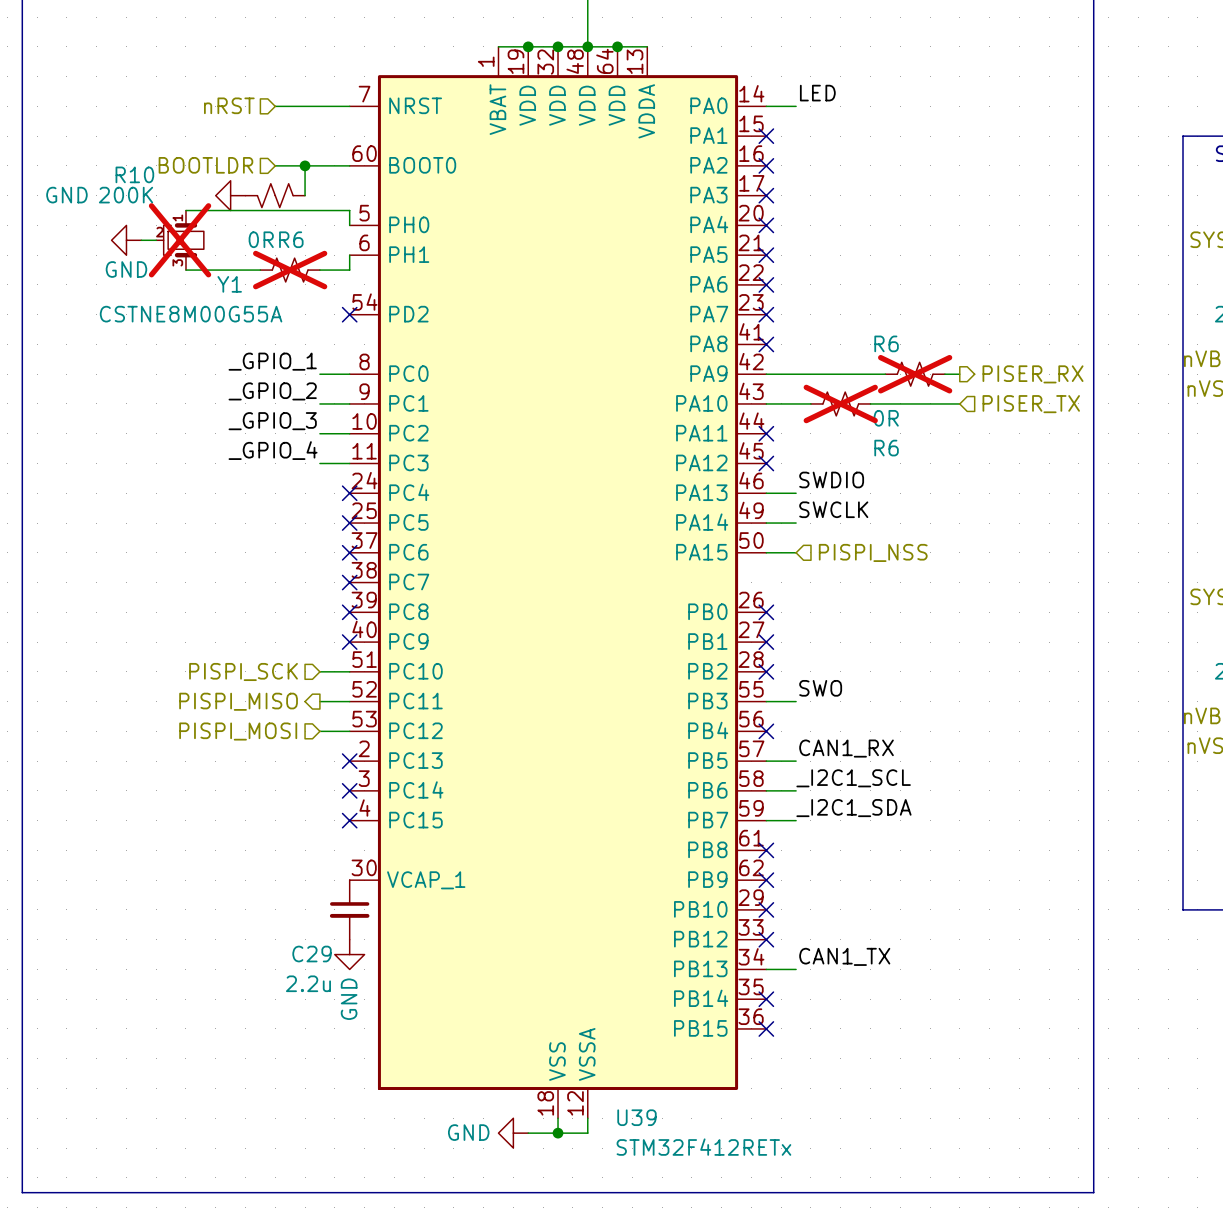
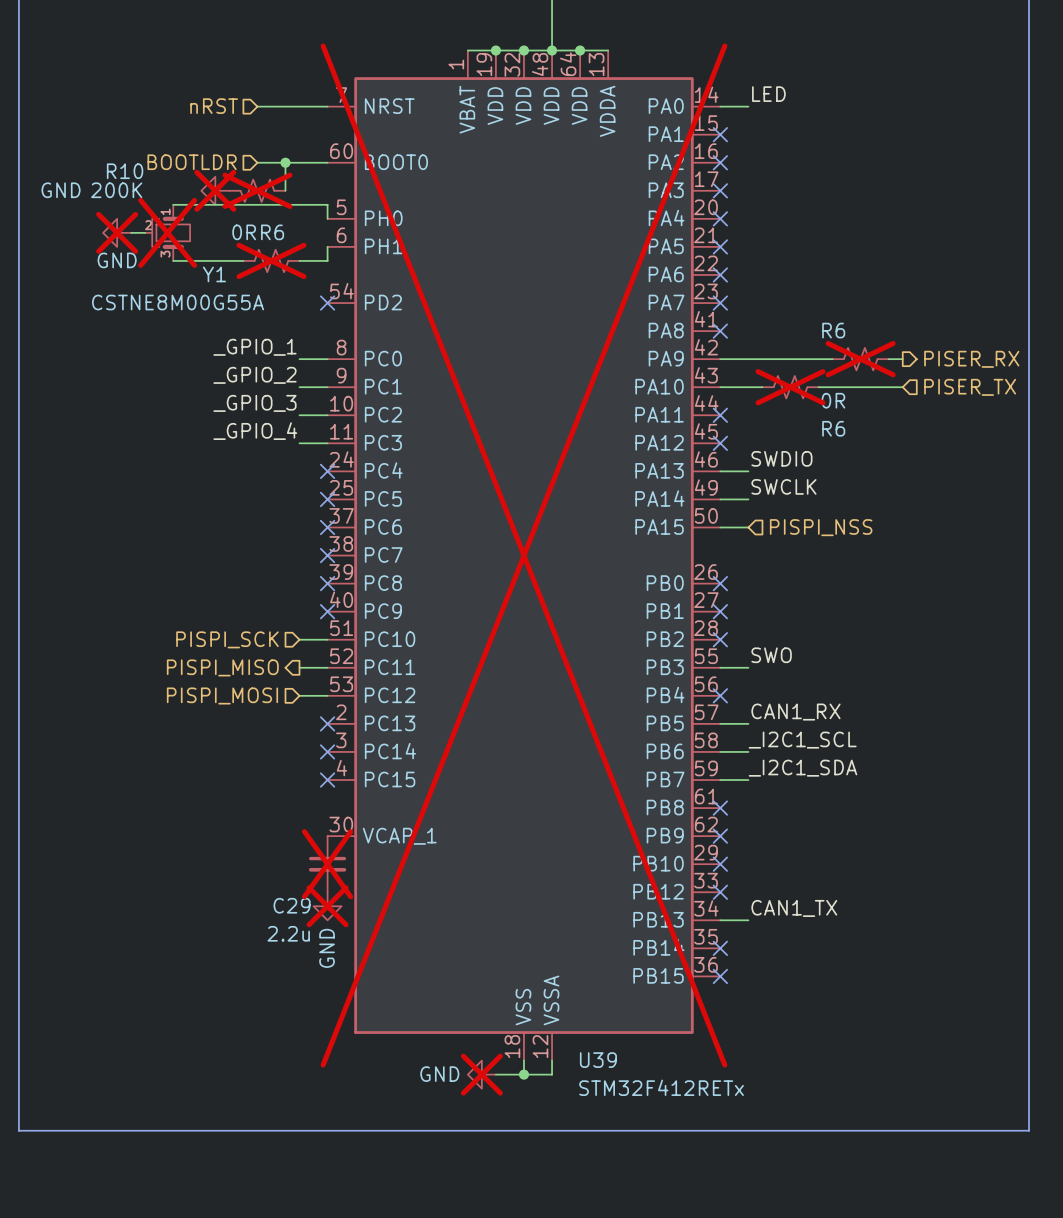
power symbol do-not-place cross: none -> (215, 190)
R10 do-not-place cross: none -> (257, 190)
power symbol do-not-place cross: none -> (117, 232)
U39 do-not-place cross: none -> (523, 555)
C29 do-not-place cross: none -> (327, 864)
power symbol do-not-place cross: none -> (327, 906)
power symbol do-not-place cross: none -> (481, 1074)

